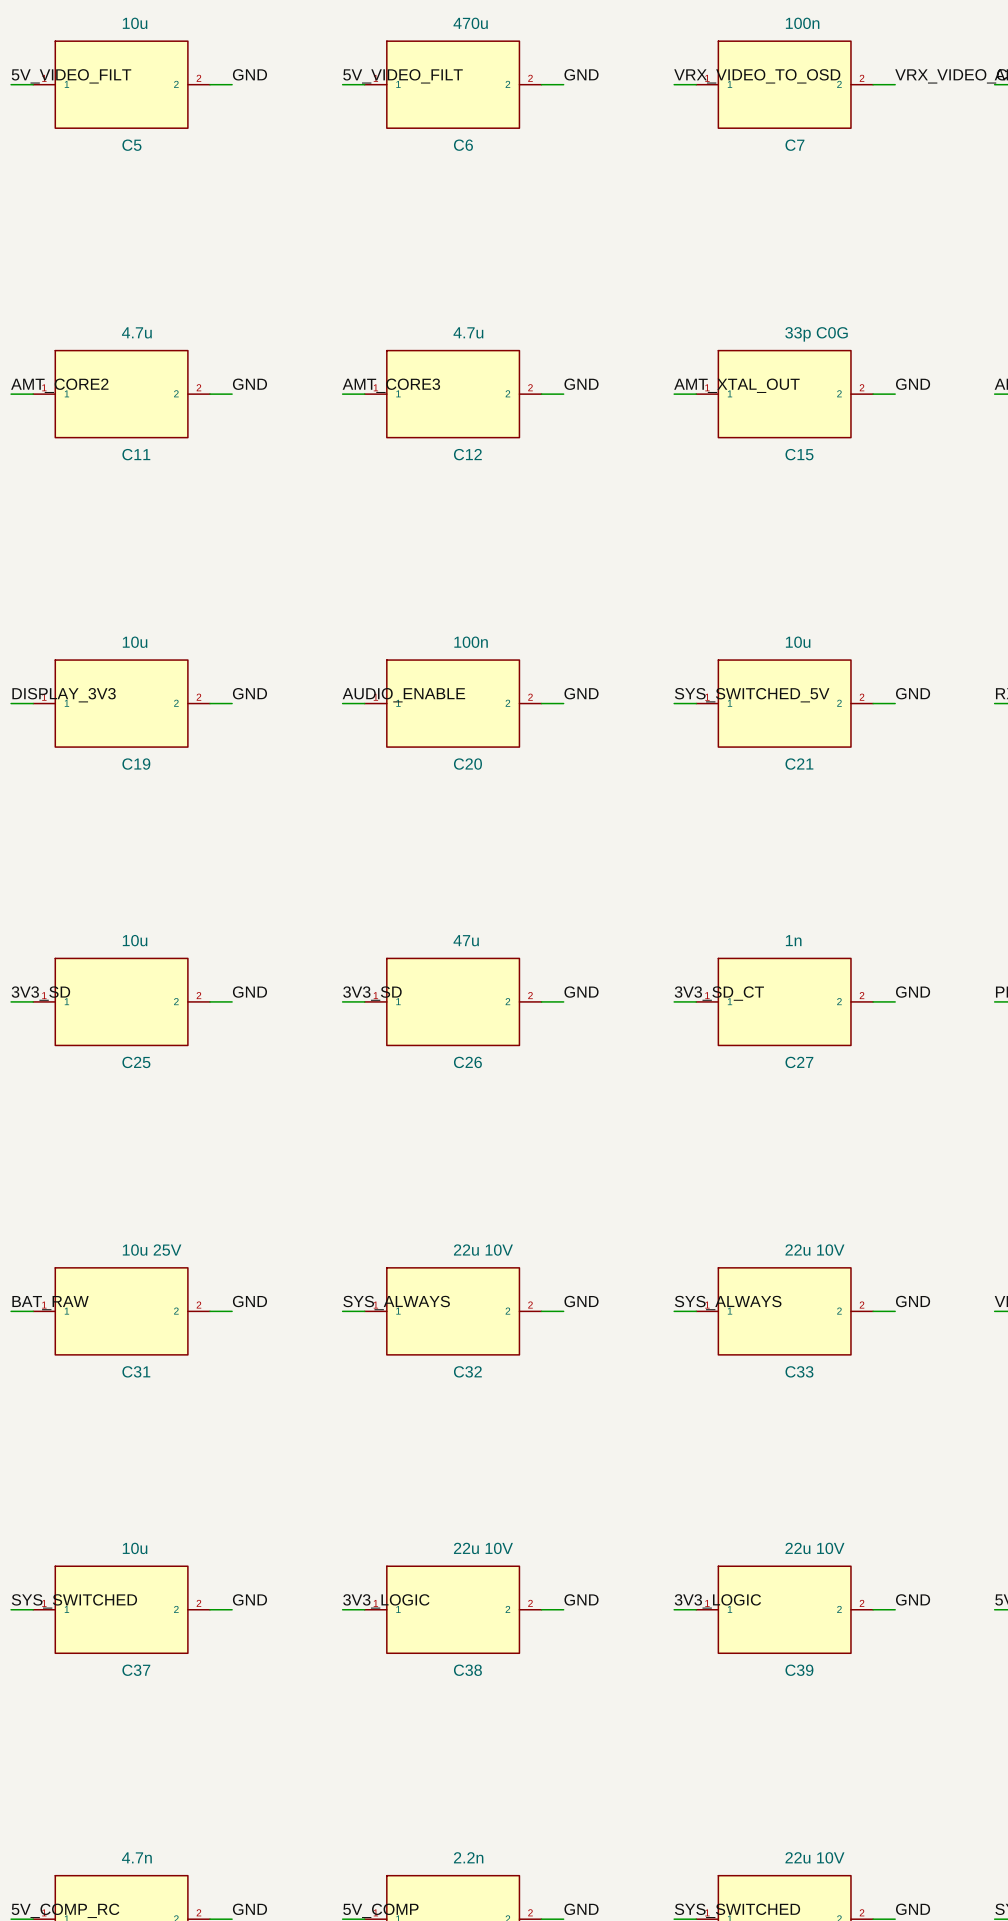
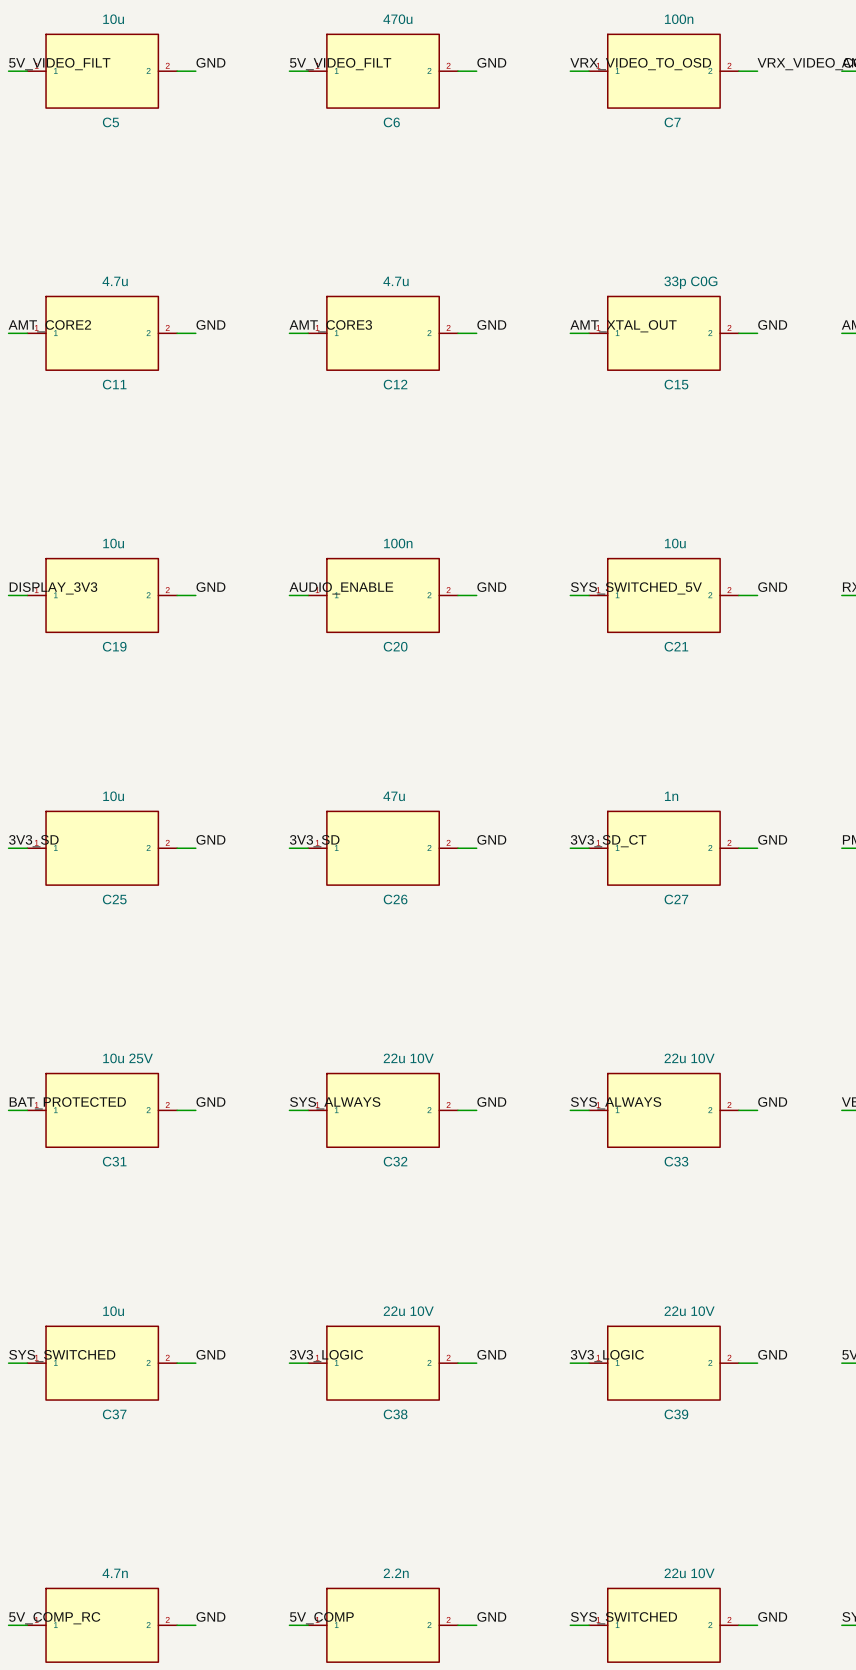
label: BAT_RAW (50, 1303) -> BAT_PROTECTED (67, 1103)

